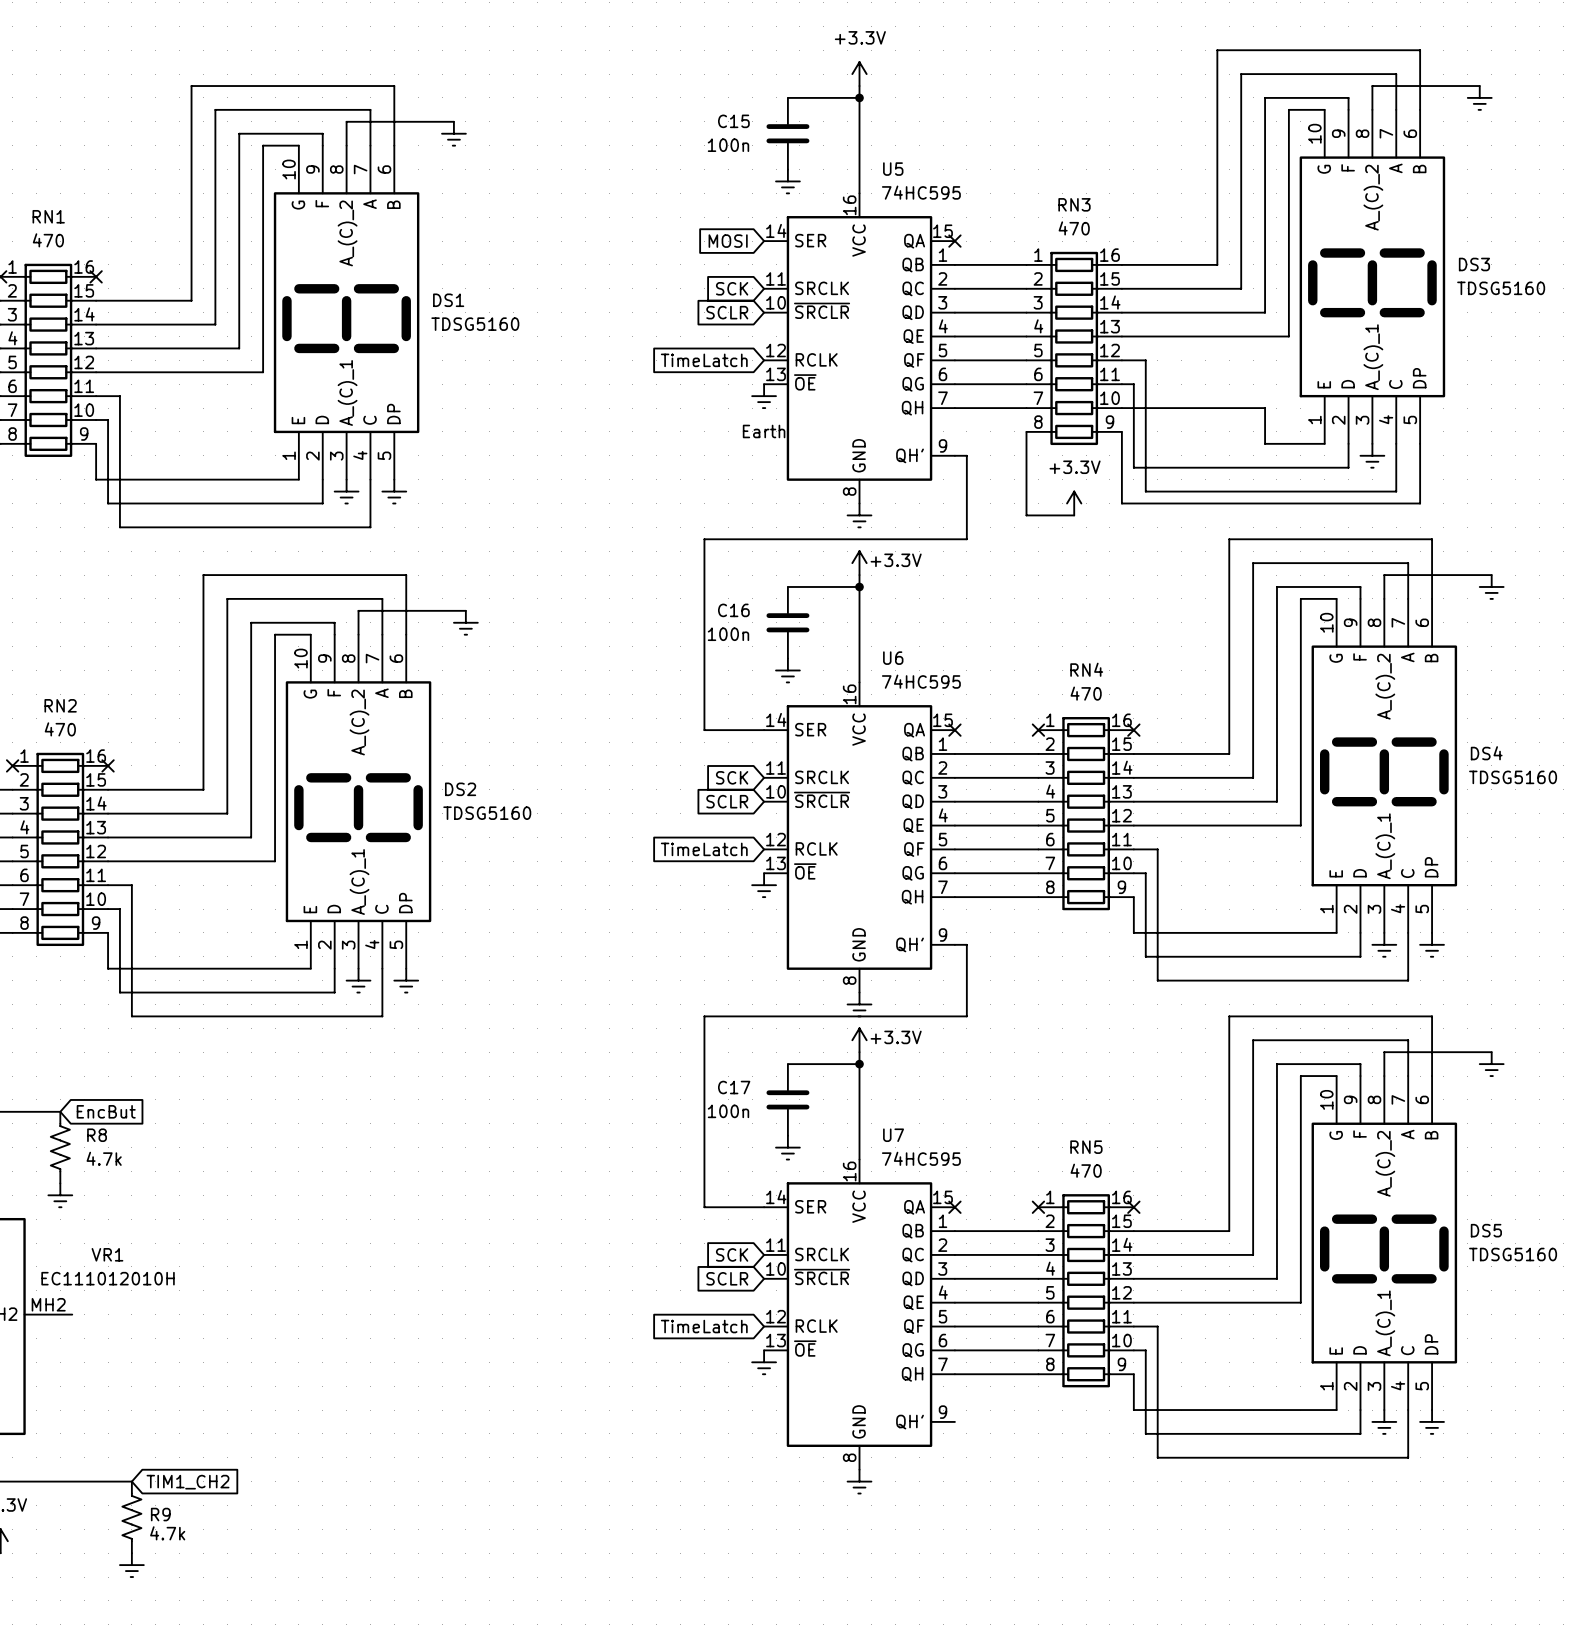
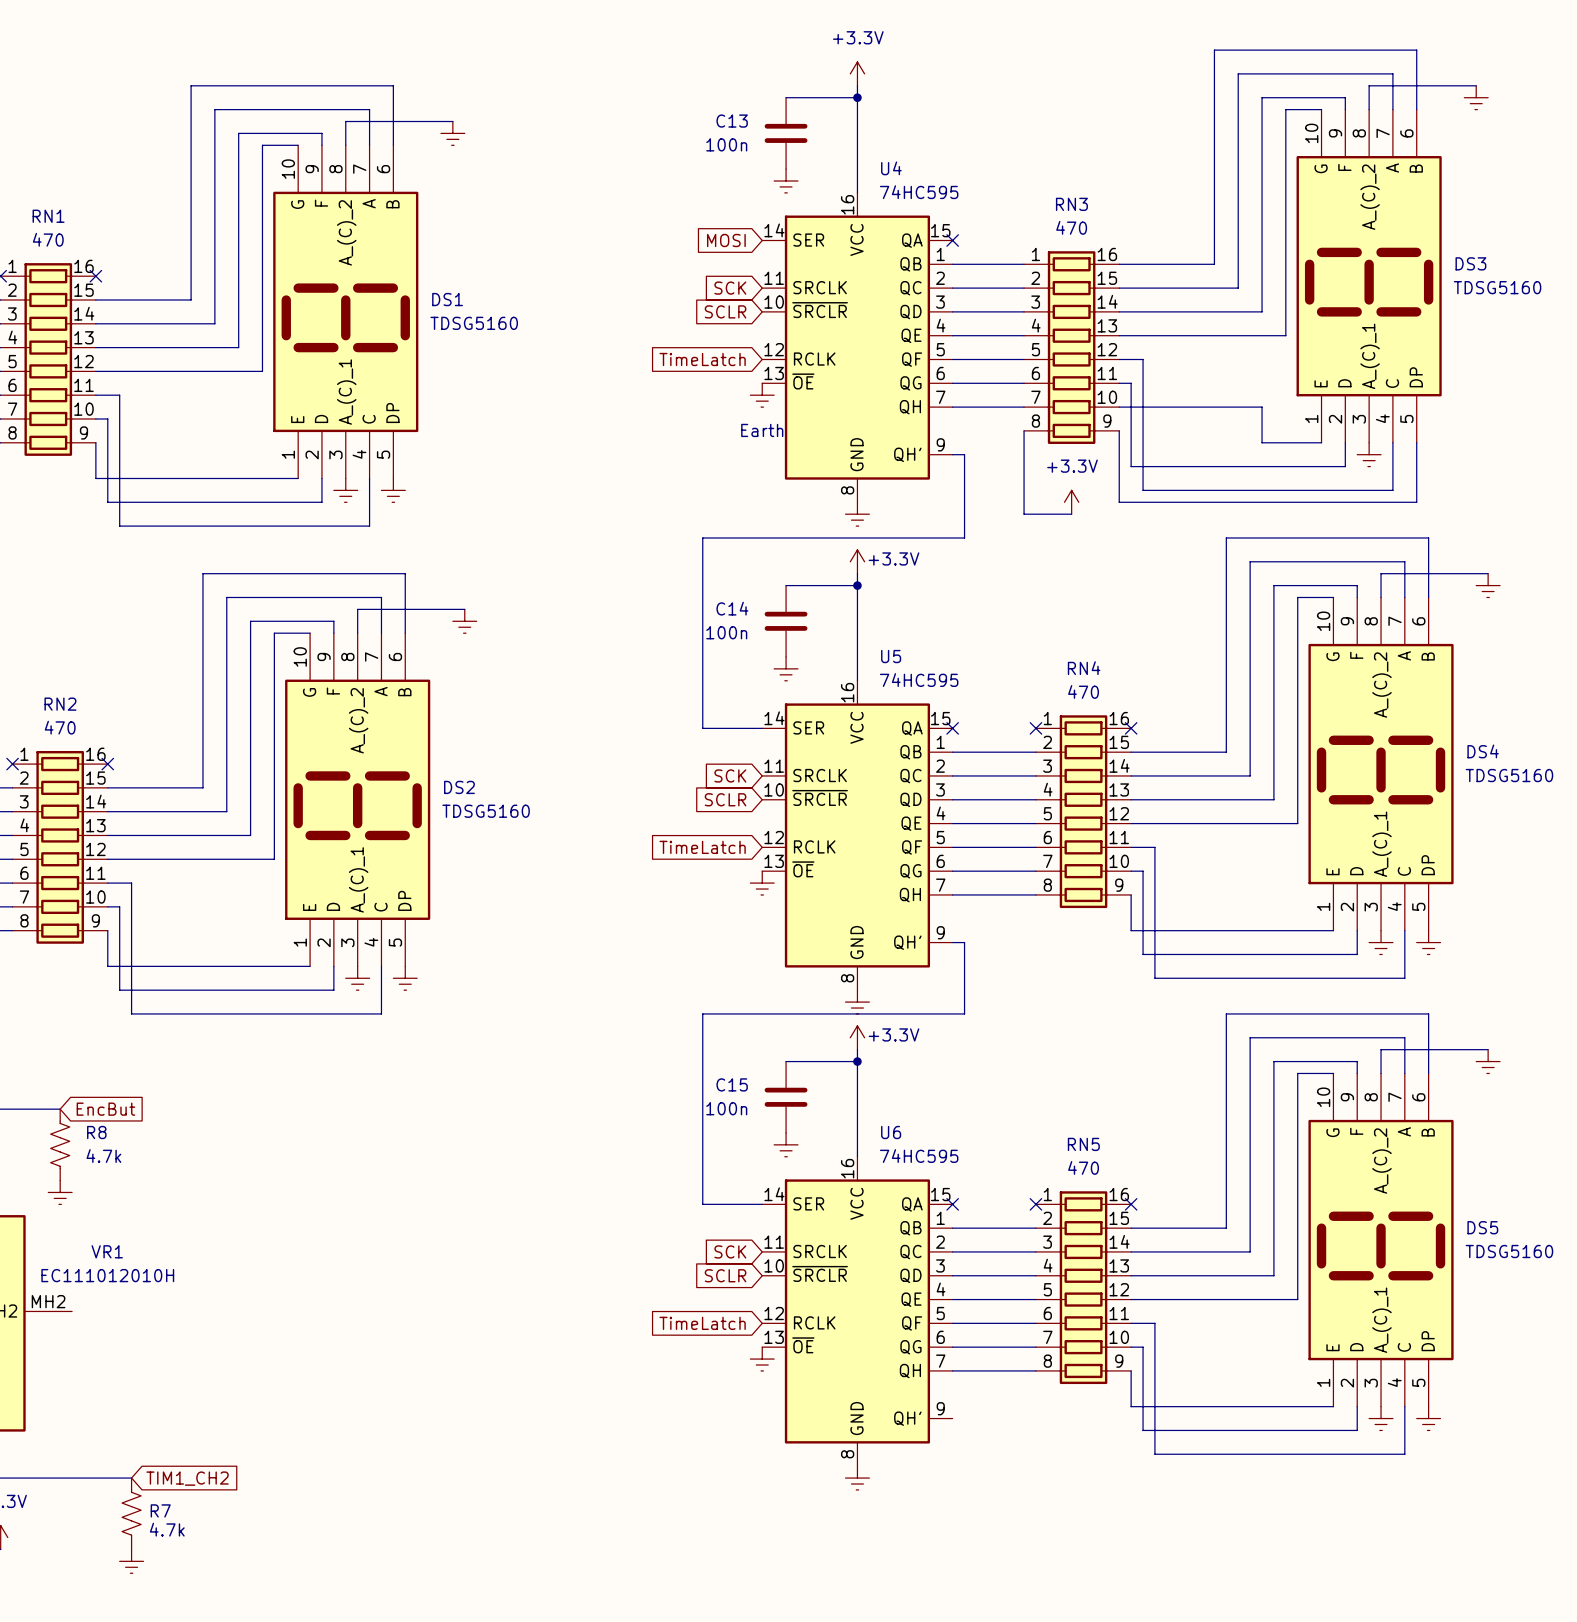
C15 name: C15 (733, 121) -> C13 (732, 121)
U5 name: U5 (893, 169) -> U4 (891, 168)
C16 name: C16 (733, 610) -> C14 (732, 608)
U6 name: U6 (893, 658) -> U5 (891, 656)
C17 name: C17 (734, 1087) -> C15 (732, 1084)
U7 name: U7 (893, 1135) -> U6 (891, 1132)
R9 name: R9 (160, 1514) -> R7 (160, 1510)

